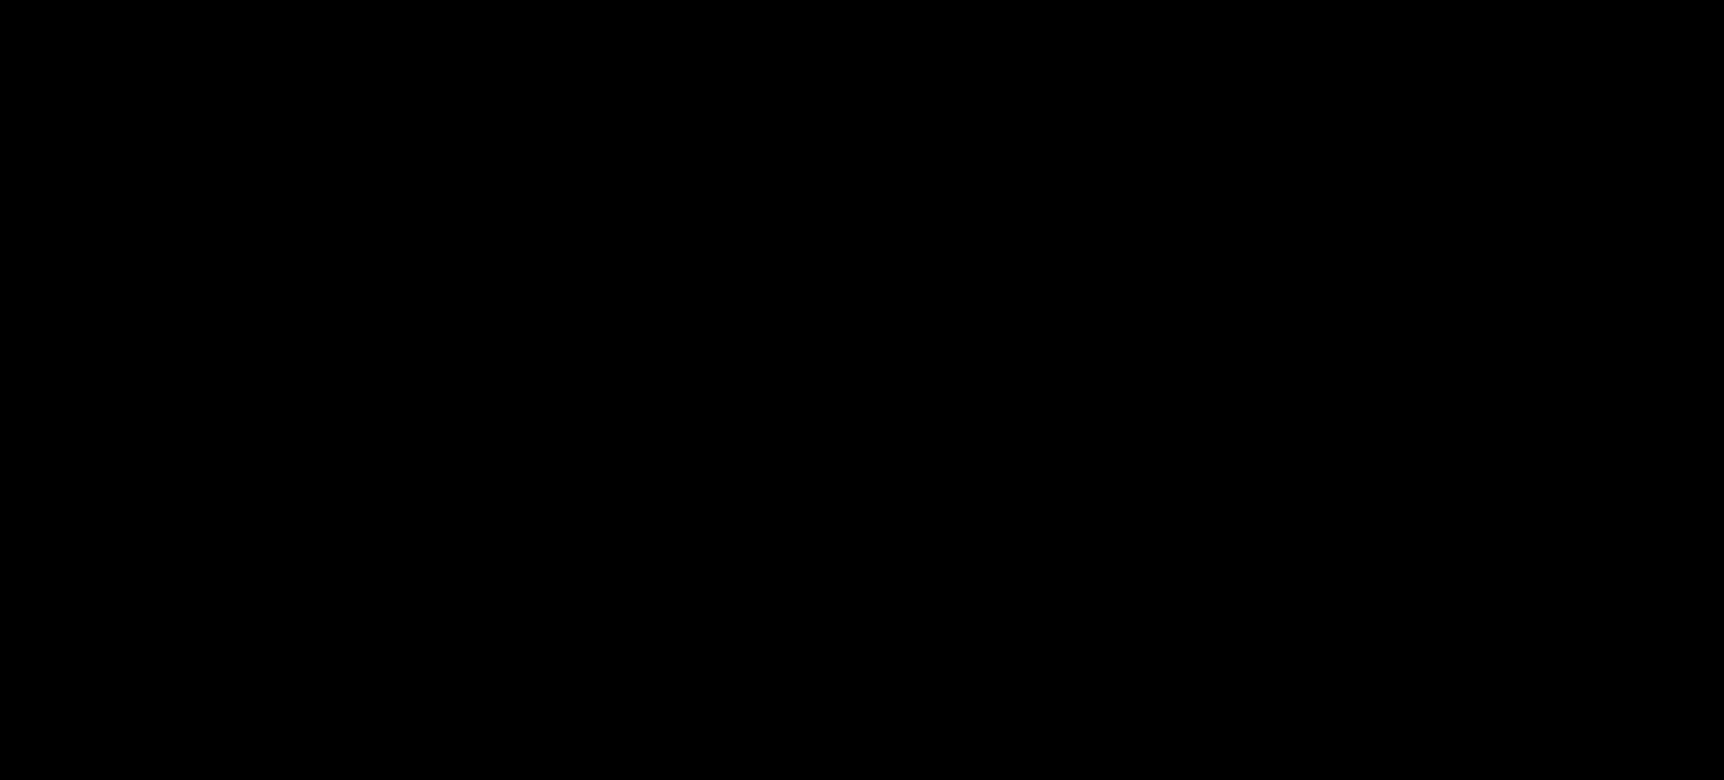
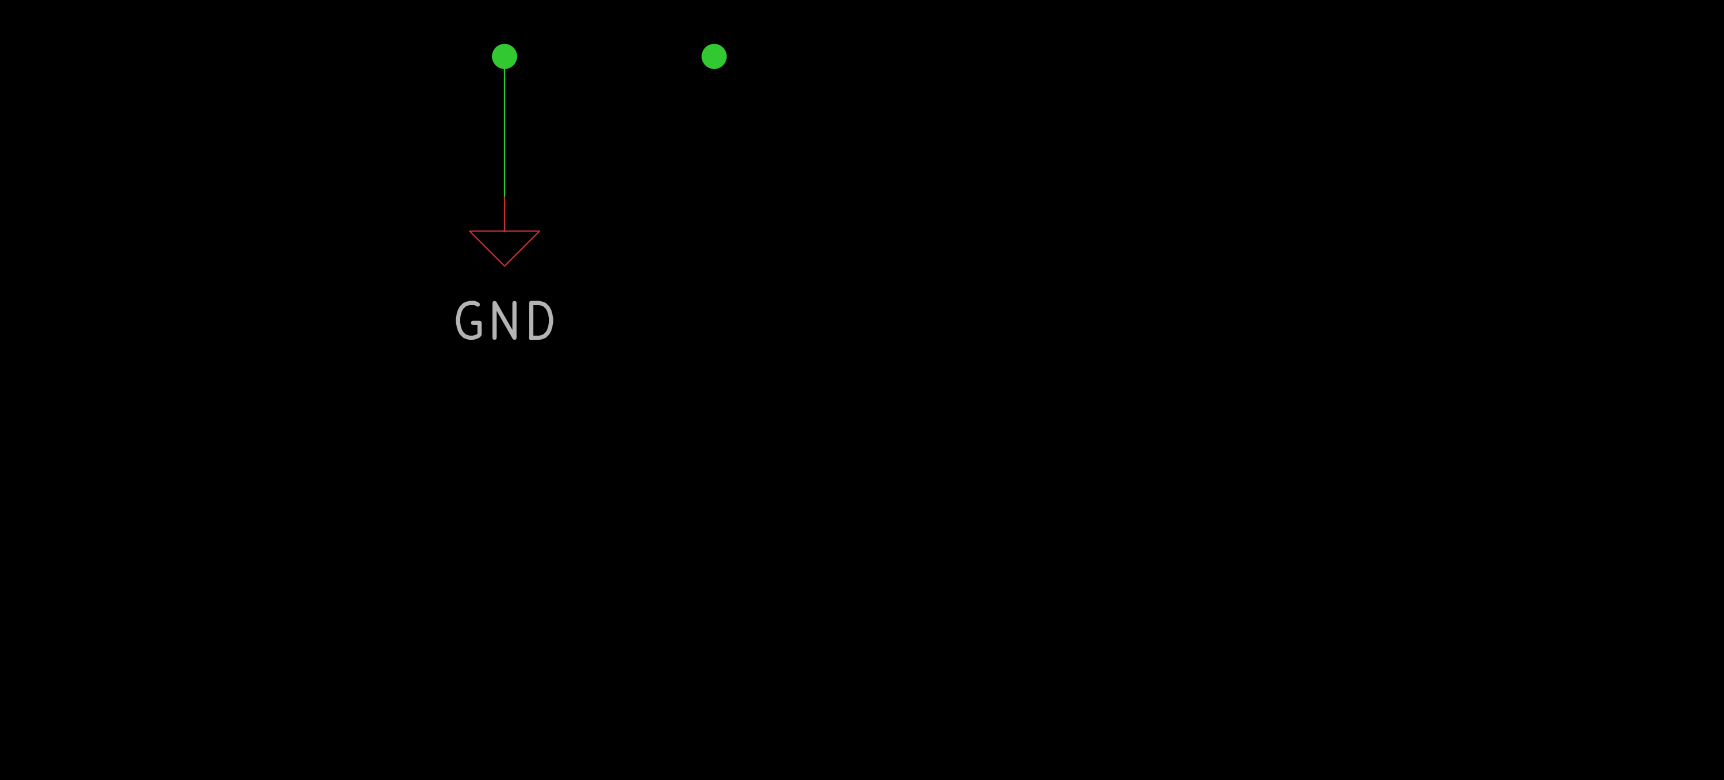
wire: none -> (504, 56) (504, 196)
junction: none -> (504, 56)
junction: none -> (714, 56)
power symbol: none -> GND (504, 231)

